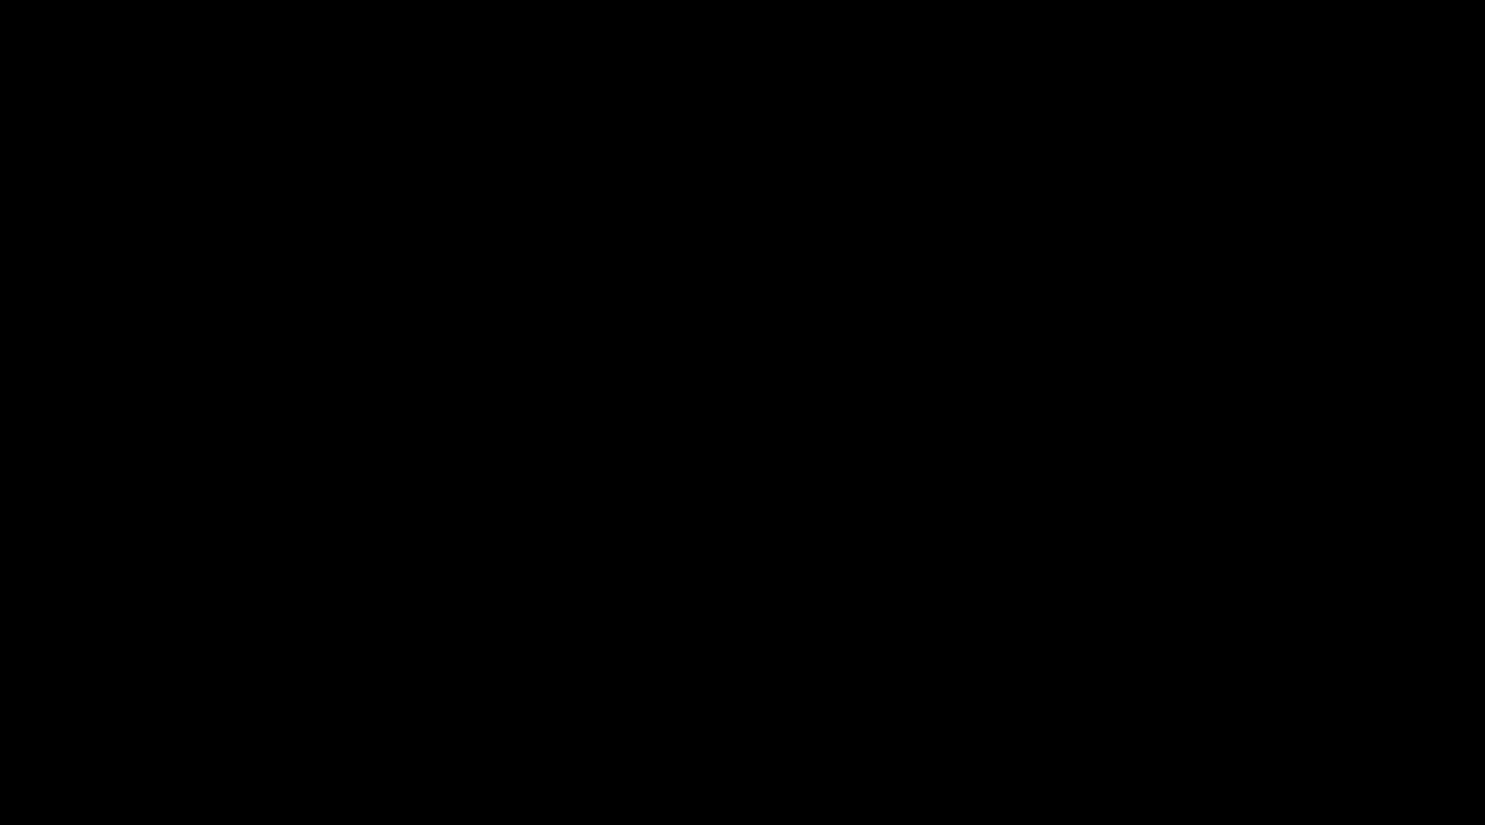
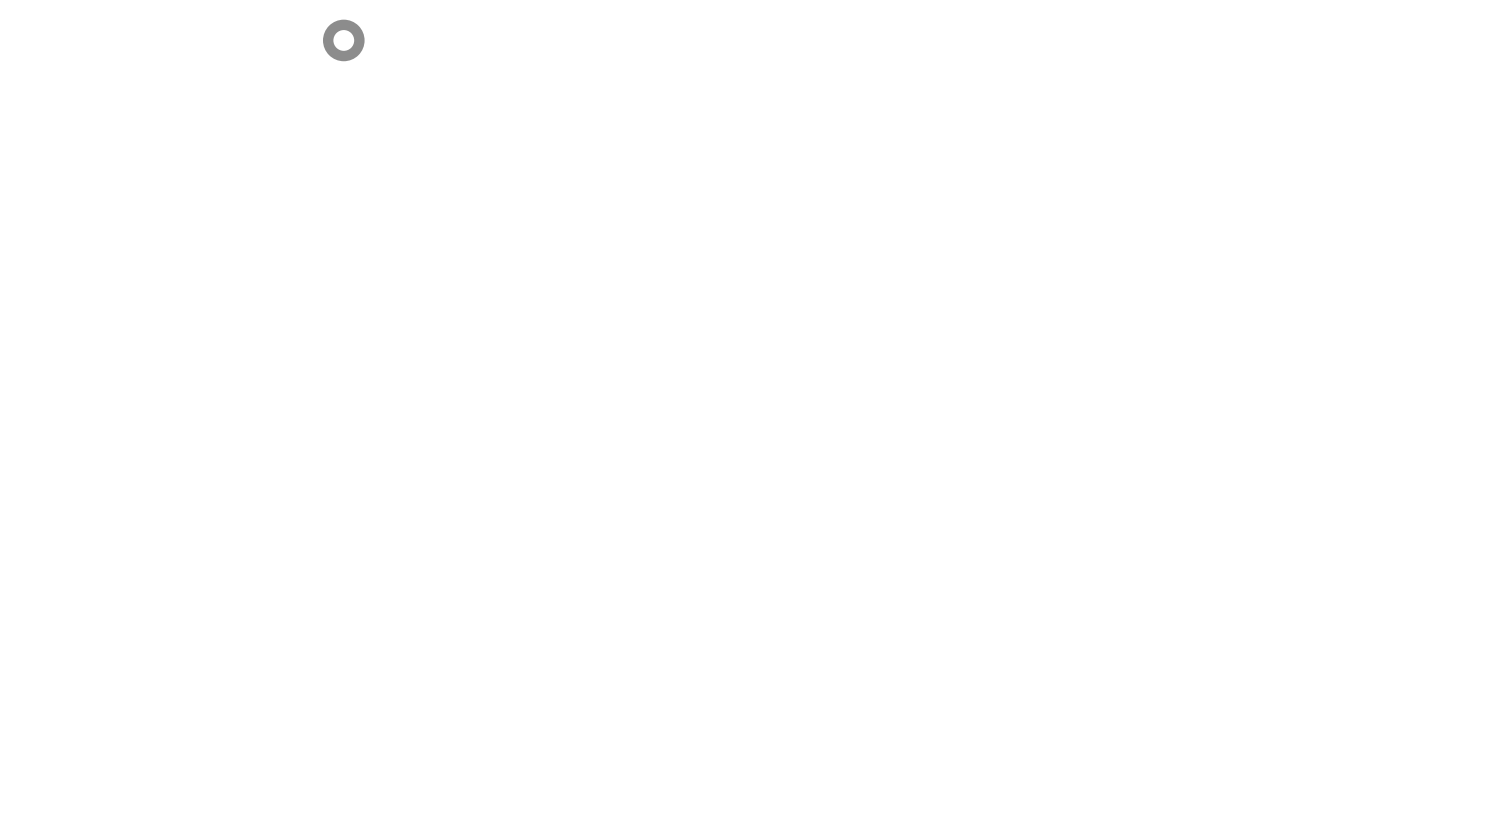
part: none -> (343, 40)

